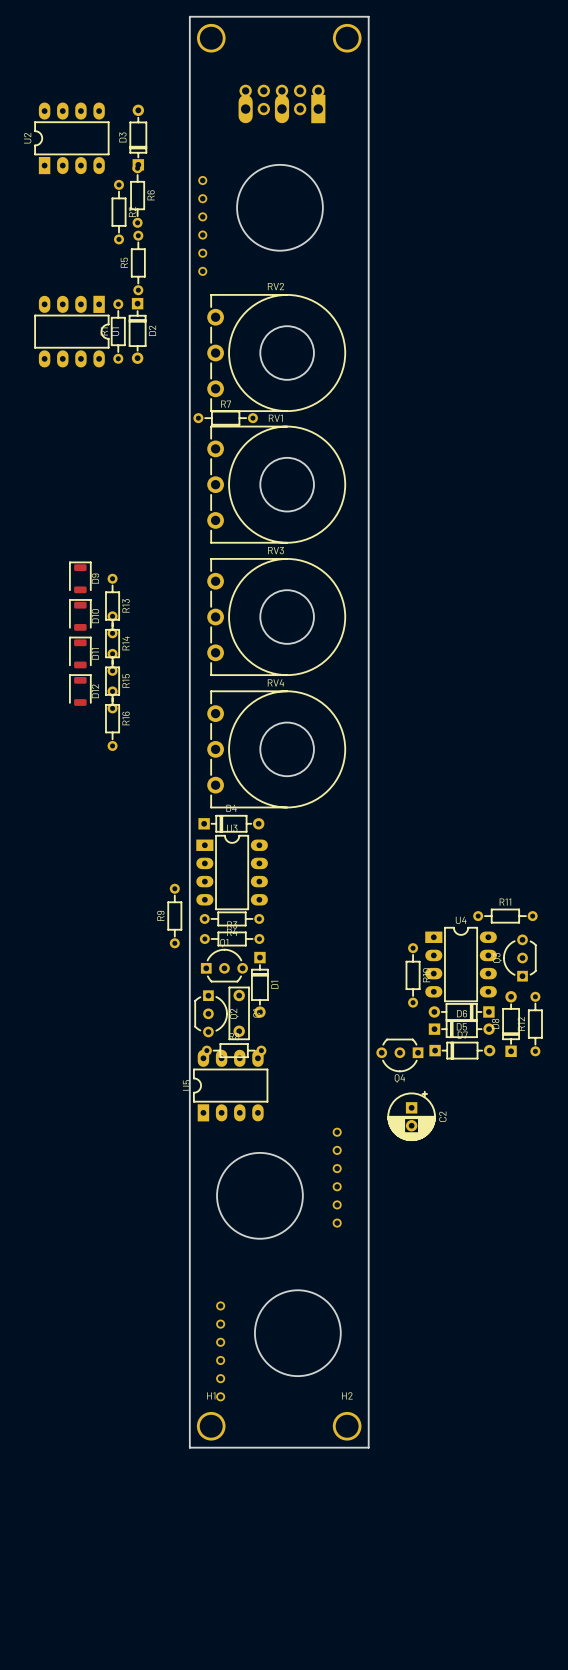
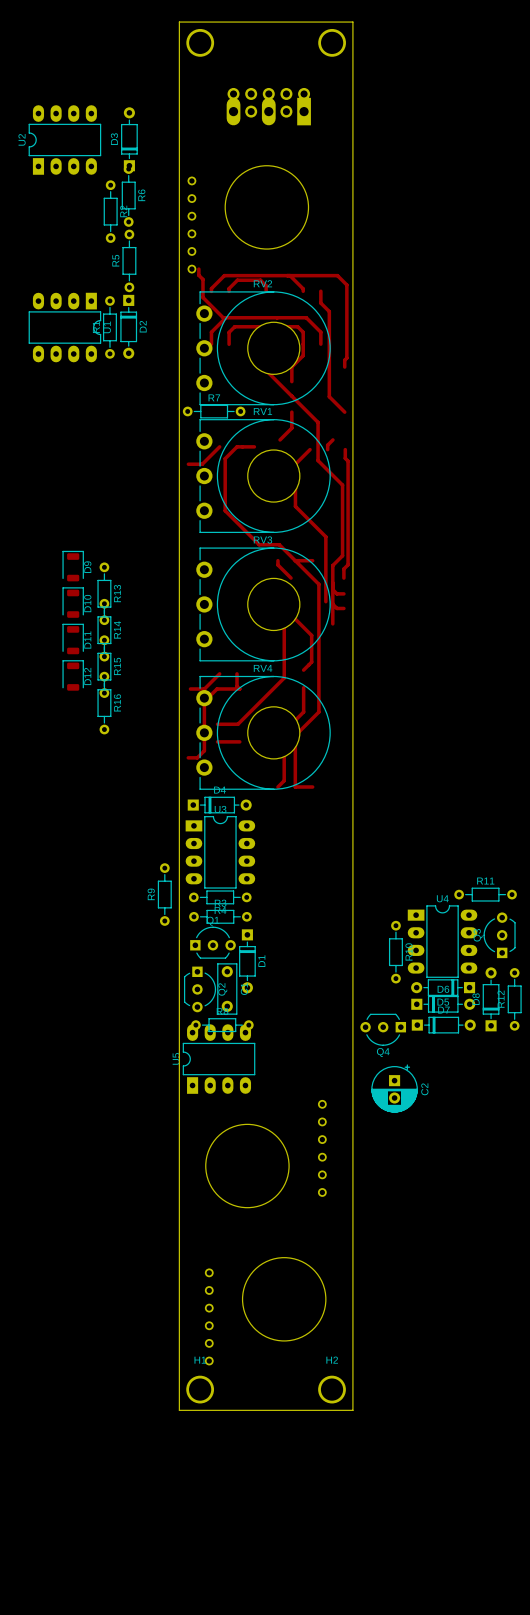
track: none -> (198, 269) (198, 275) (202, 279) (202, 297) (223, 317) (306, 317) (320, 332) (320, 344)
track: none -> (289, 275) (303, 288) (303, 291)
track: none -> (211, 291) (211, 288) (224, 275) (337, 275) (346, 284) (346, 358) (344, 360) (344, 367)
track: none -> (266, 291) (266, 285) (260, 280) (237, 280) (229, 288) (229, 291)
track: none -> (320, 291) (320, 303) (329, 311) (329, 396) (344, 412)
track: none -> (225, 317) (211, 332) (211, 344)
track: none -> (229, 344) (229, 332) (234, 326) (297, 326) (303, 332) (303, 355) (291, 367) (291, 381)
track: none -> (266, 344) (266, 370) (318, 422) (318, 460) (342, 485) (342, 555) (332, 565) (332, 603)
track: none -> (291, 412) (291, 428) (280, 439)
track: none -> (332, 439) (327, 445) (327, 449)
track: none -> (219, 446) (202, 464) (188, 464)
track: none -> (254, 446) (237, 446) (225, 458) (225, 510) (259, 544) (279, 544) (318, 584) (318, 712) (295, 735) (295, 787) (312, 787)
track: none -> (310, 449) (295, 464) (295, 506) (325, 536) (325, 601)
track: none -> (345, 449) (345, 458) (348, 461) (348, 564) (343, 568) (343, 578)
track: none -> (277, 560) (277, 565) (291, 578)
track: none -> (295, 560) (312, 560)
track: none -> (332, 589) (337, 593) (343, 593)
track: none -> (291, 594) (284, 601) (284, 677) (237, 724) (217, 724)
track: none -> (332, 603) (332, 623)
track: none -> (332, 604) (337, 608) (343, 608)
track: none -> (291, 608) (291, 615) (311, 635) (311, 662) (303, 670)
track: none -> (219, 673) (204, 688) (190, 688)
track: none -> (237, 673) (237, 686) (239, 688) (217, 688) (204, 701) (204, 750) (197, 757) (188, 757)
track: none -> (303, 687) (303, 712) (284, 731) (284, 780) (277, 787)
track: none -> (217, 741) (239, 741)

